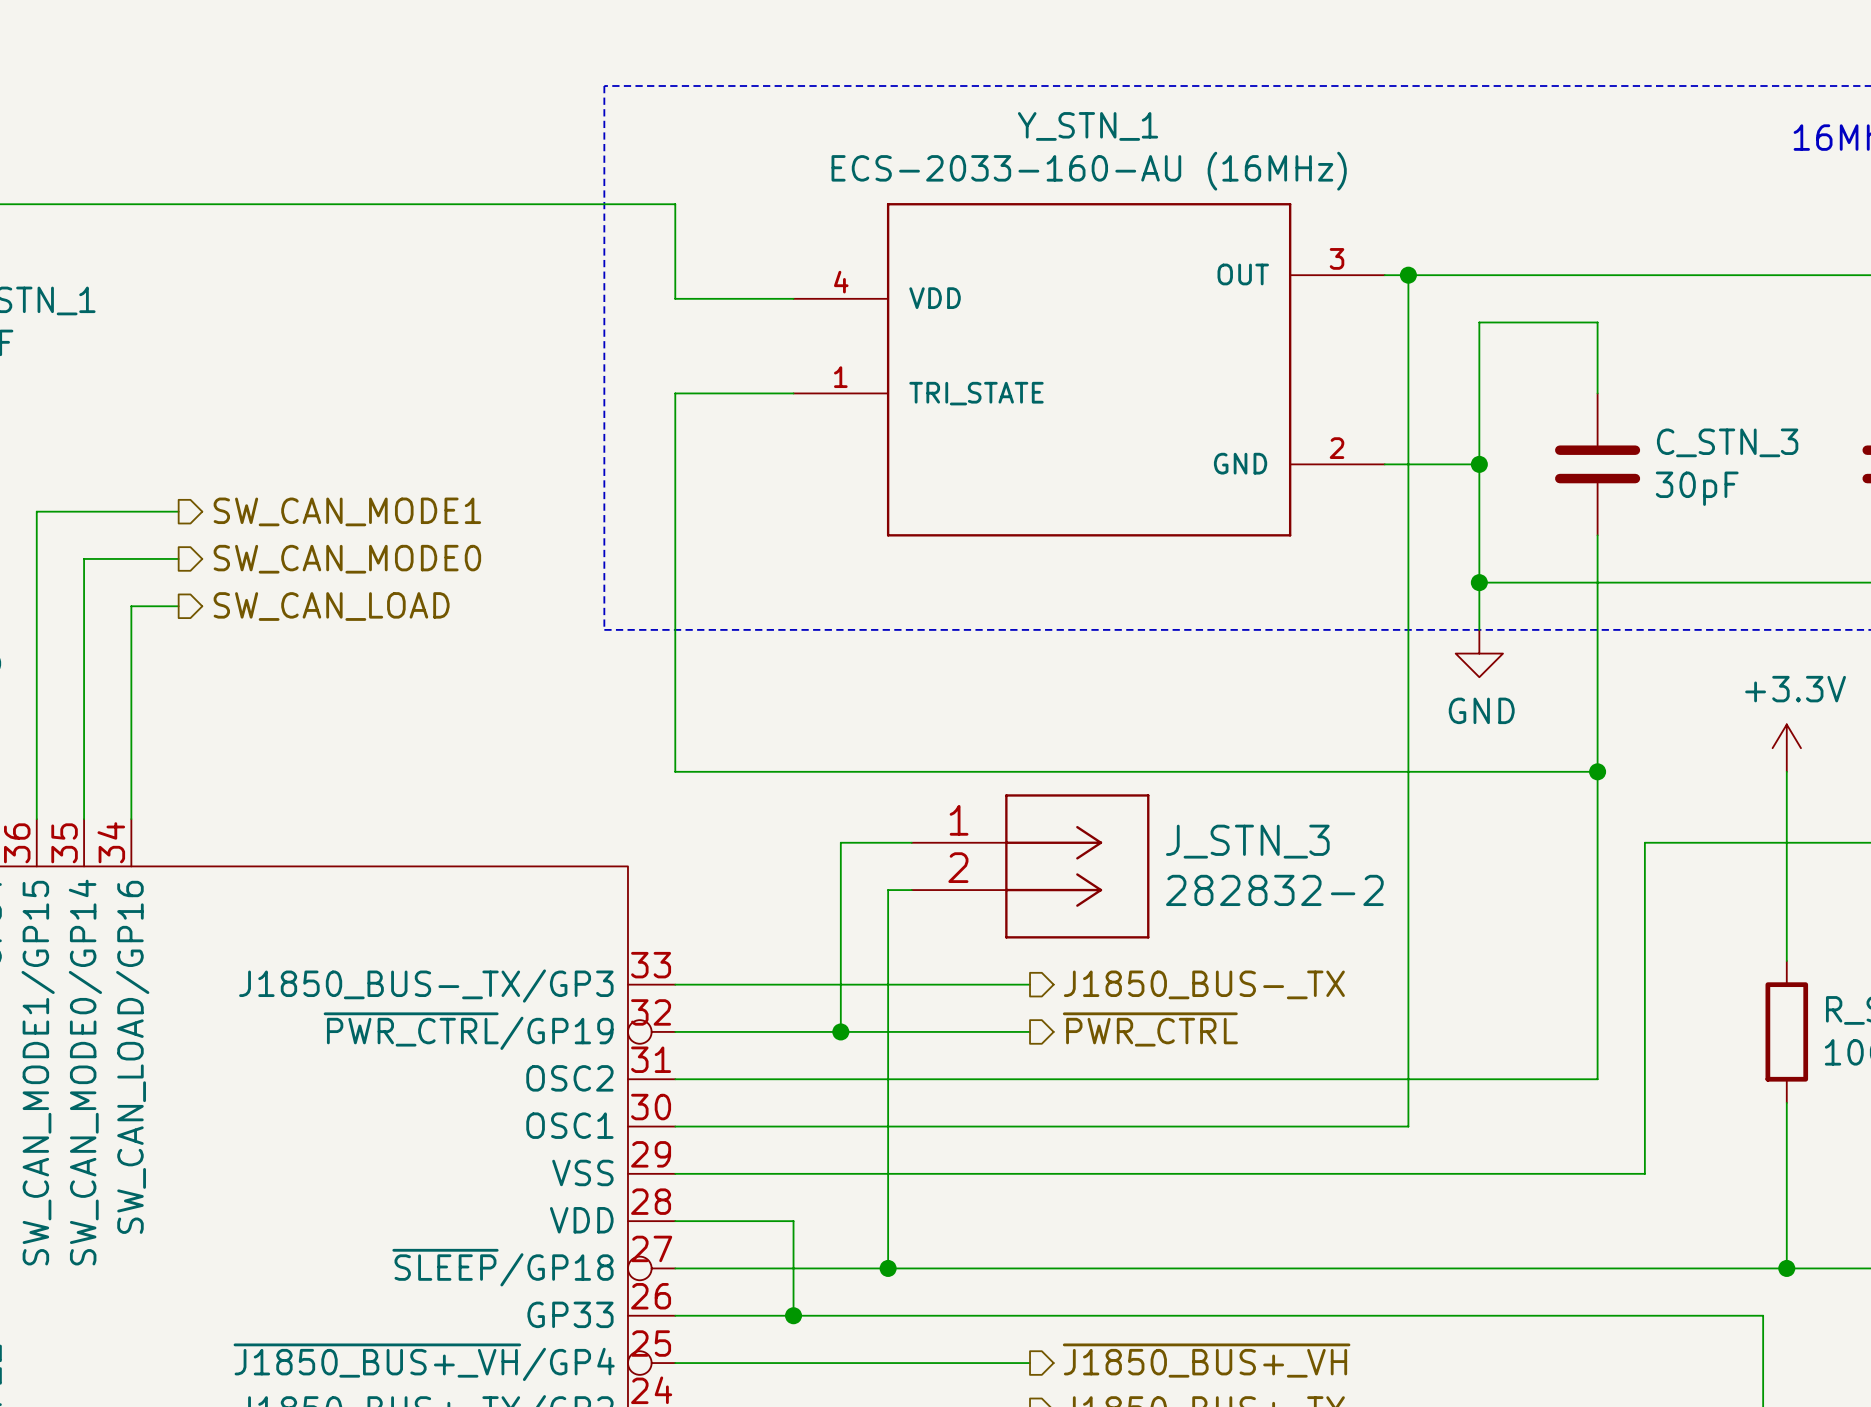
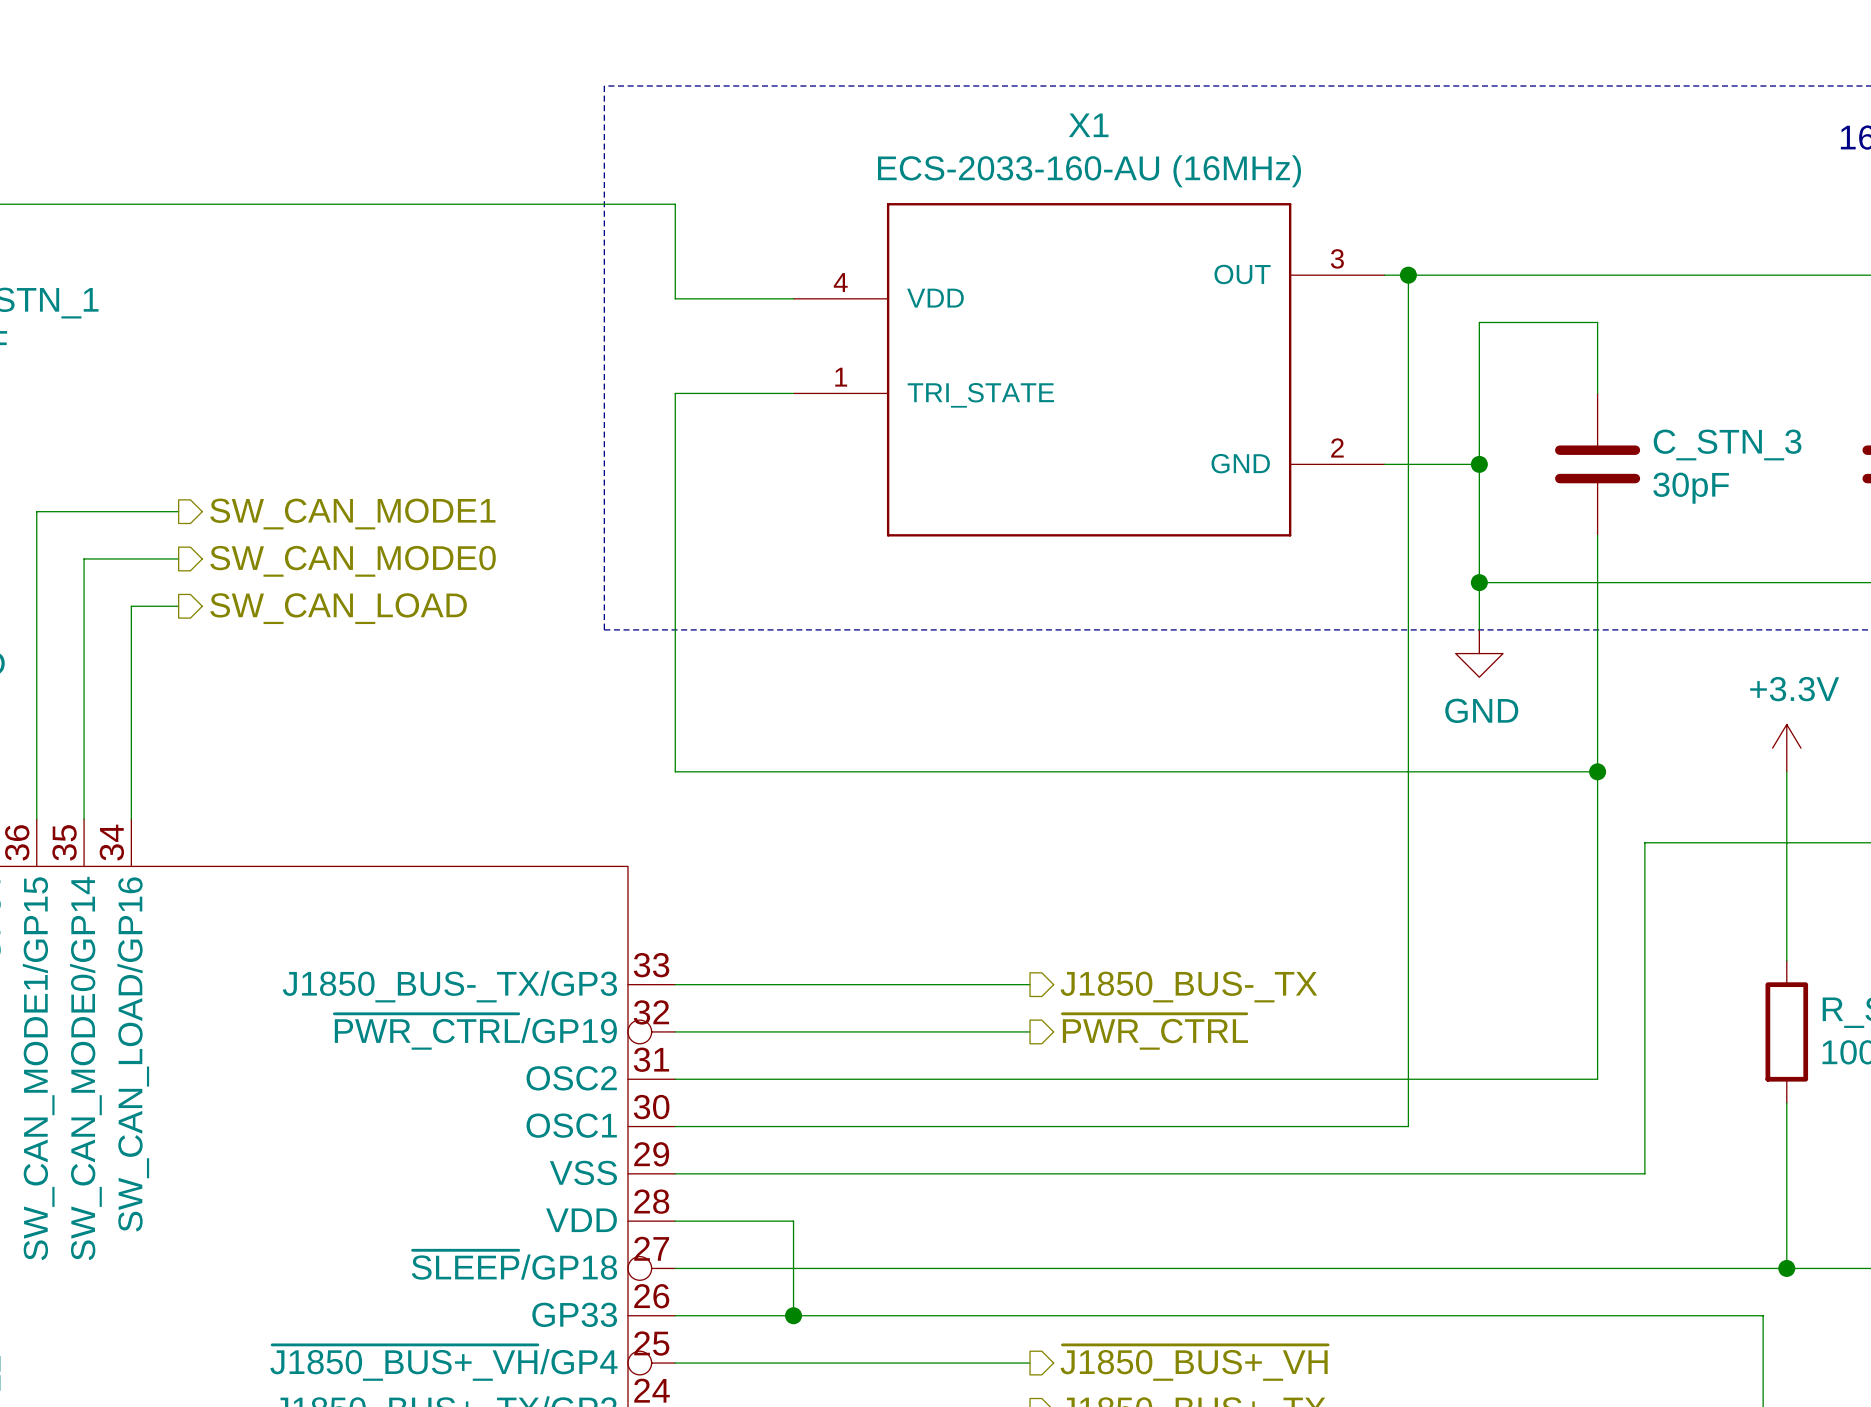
Y_STN_1 name: Y_STN_1 (1088, 126) -> X1 (1088, 125)
wire: (911, 842) (840, 842) (840, 1031) -> none
J_STN_3: 282832-2 (1030, 866) -> none
wire: (911, 890) (888, 890) (888, 1268) -> none
junction: (840, 1031) -> none
junction: (888, 1268) -> none

